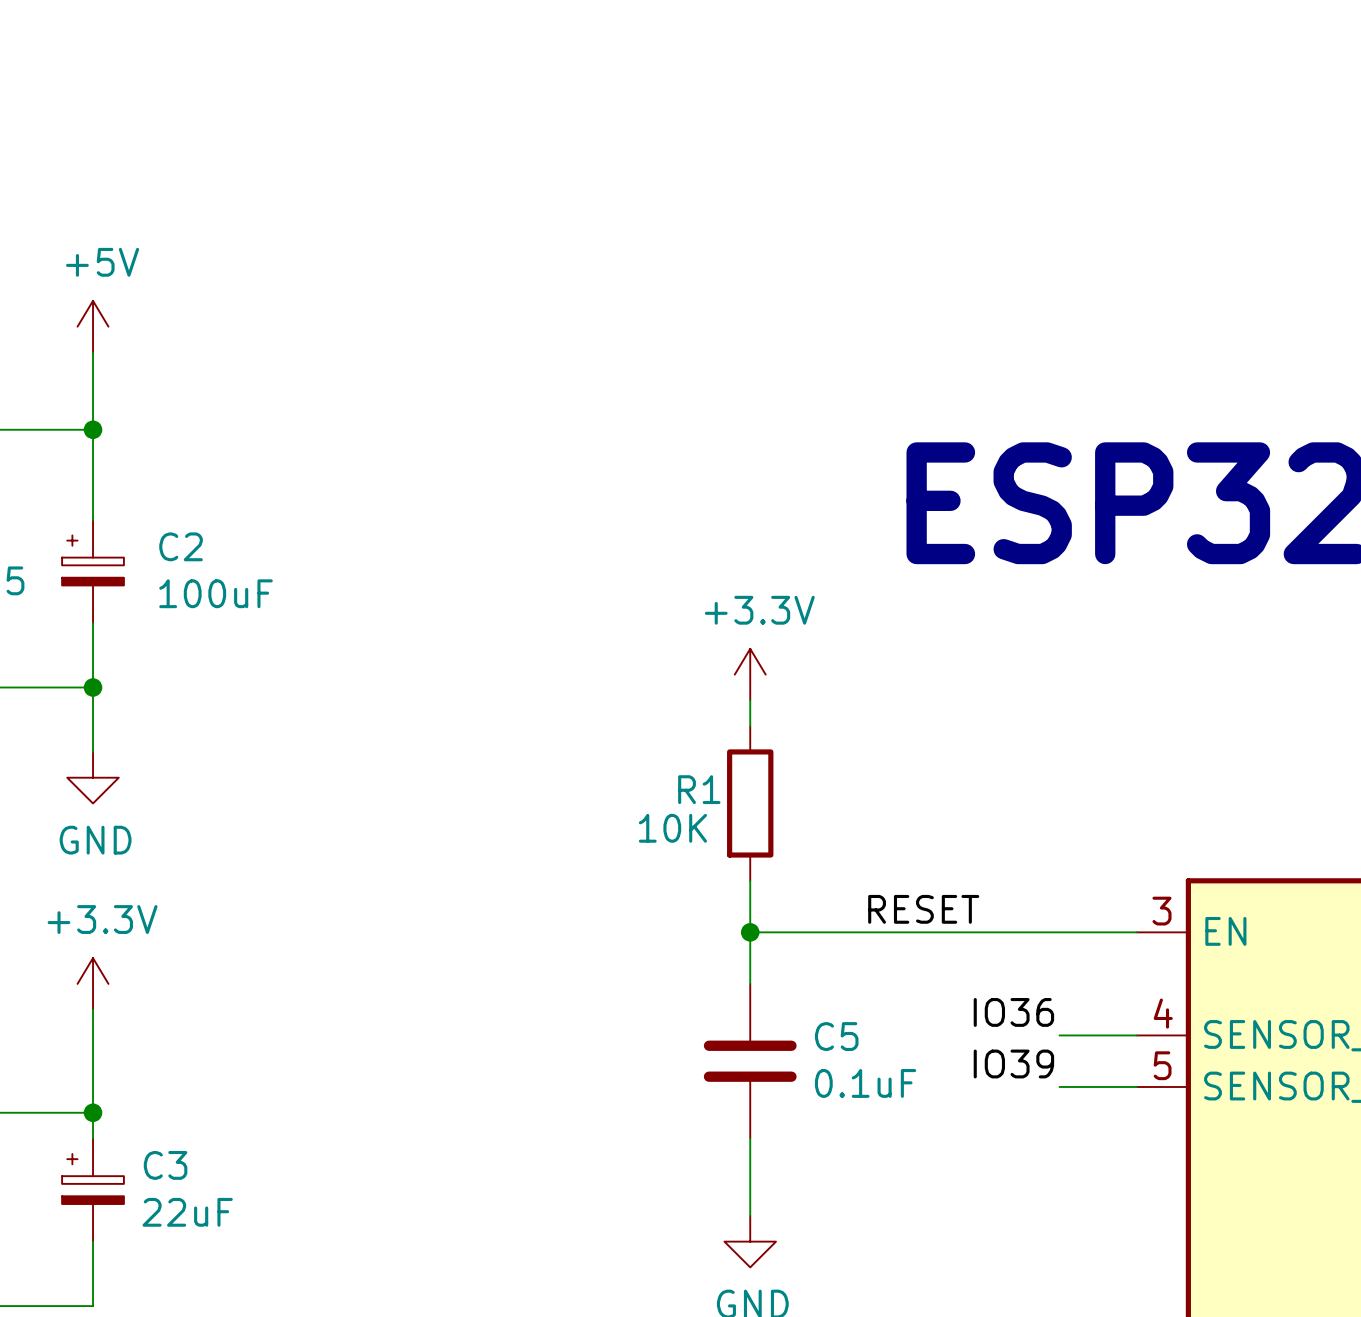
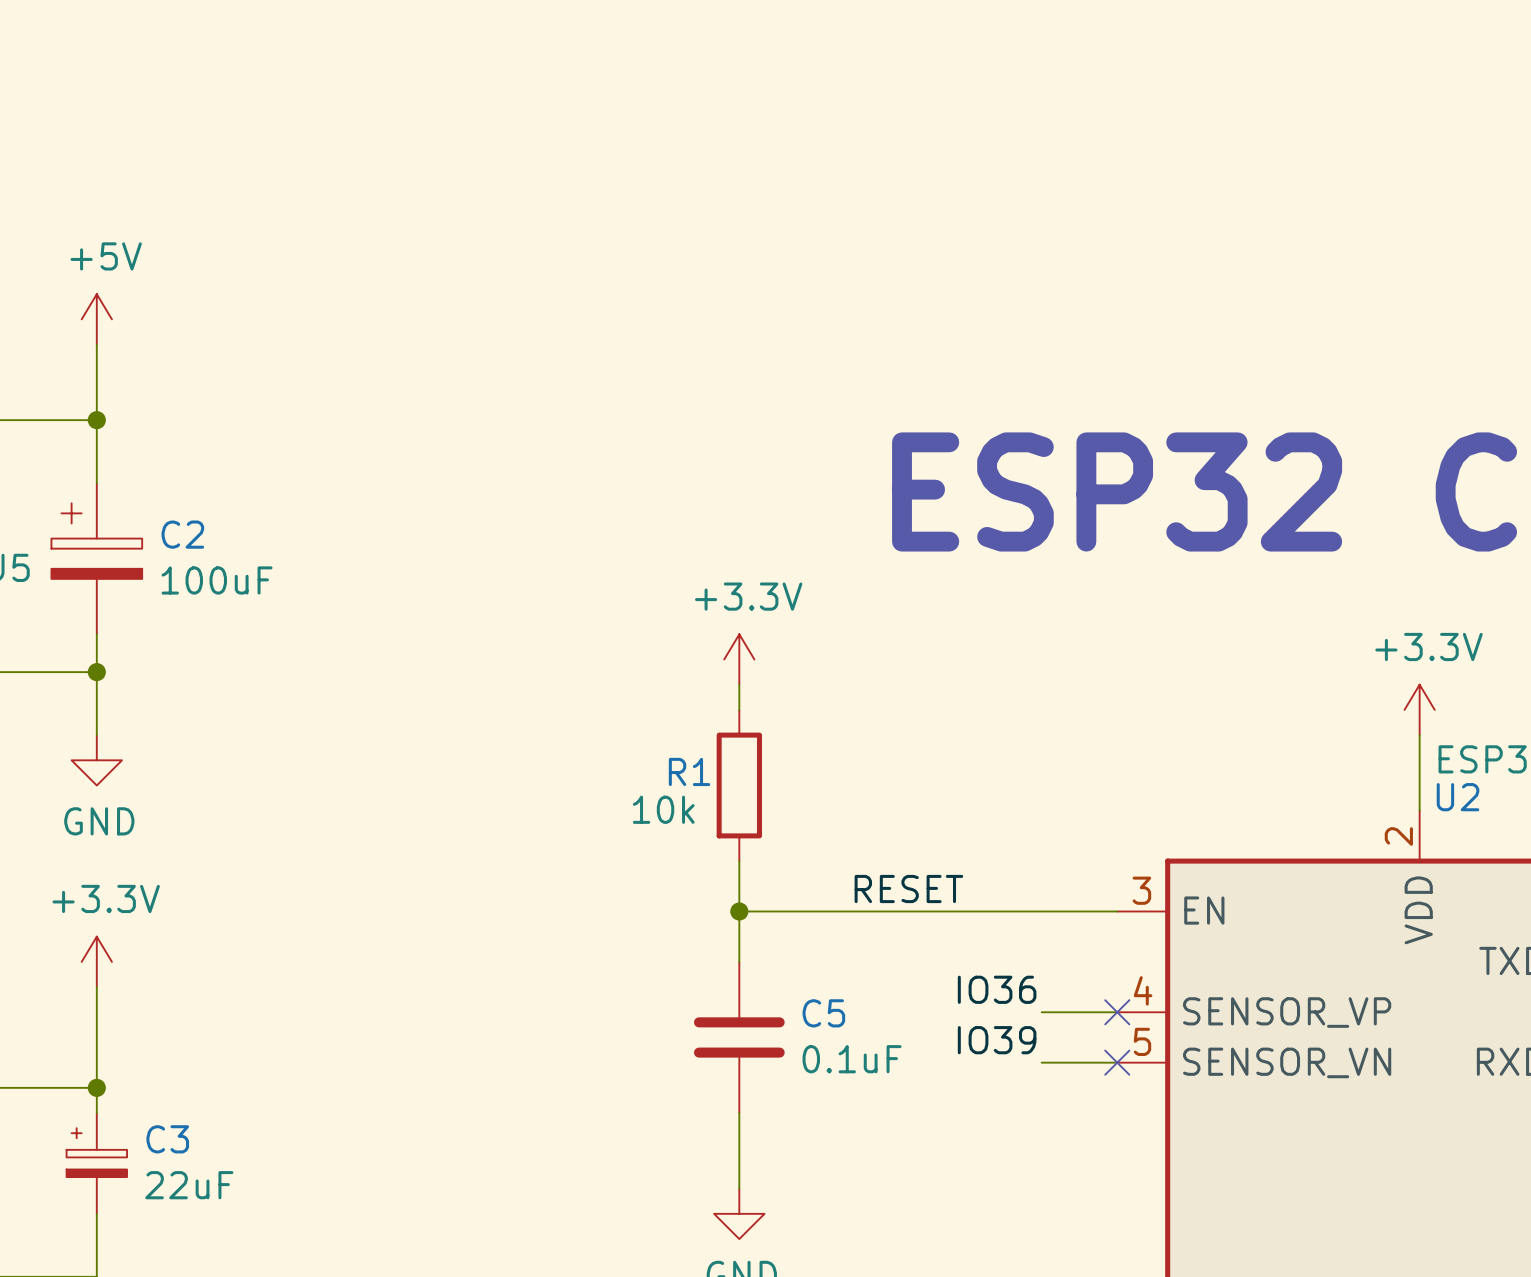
C2 symbol: [62, 519, 124, 624] -> [51, 483, 143, 635]
R1 value: 10K (672, 828) -> 10k (663, 809)
no-connect mark: none -> (1117, 1012)
no-connect mark: none -> (1117, 1062)

